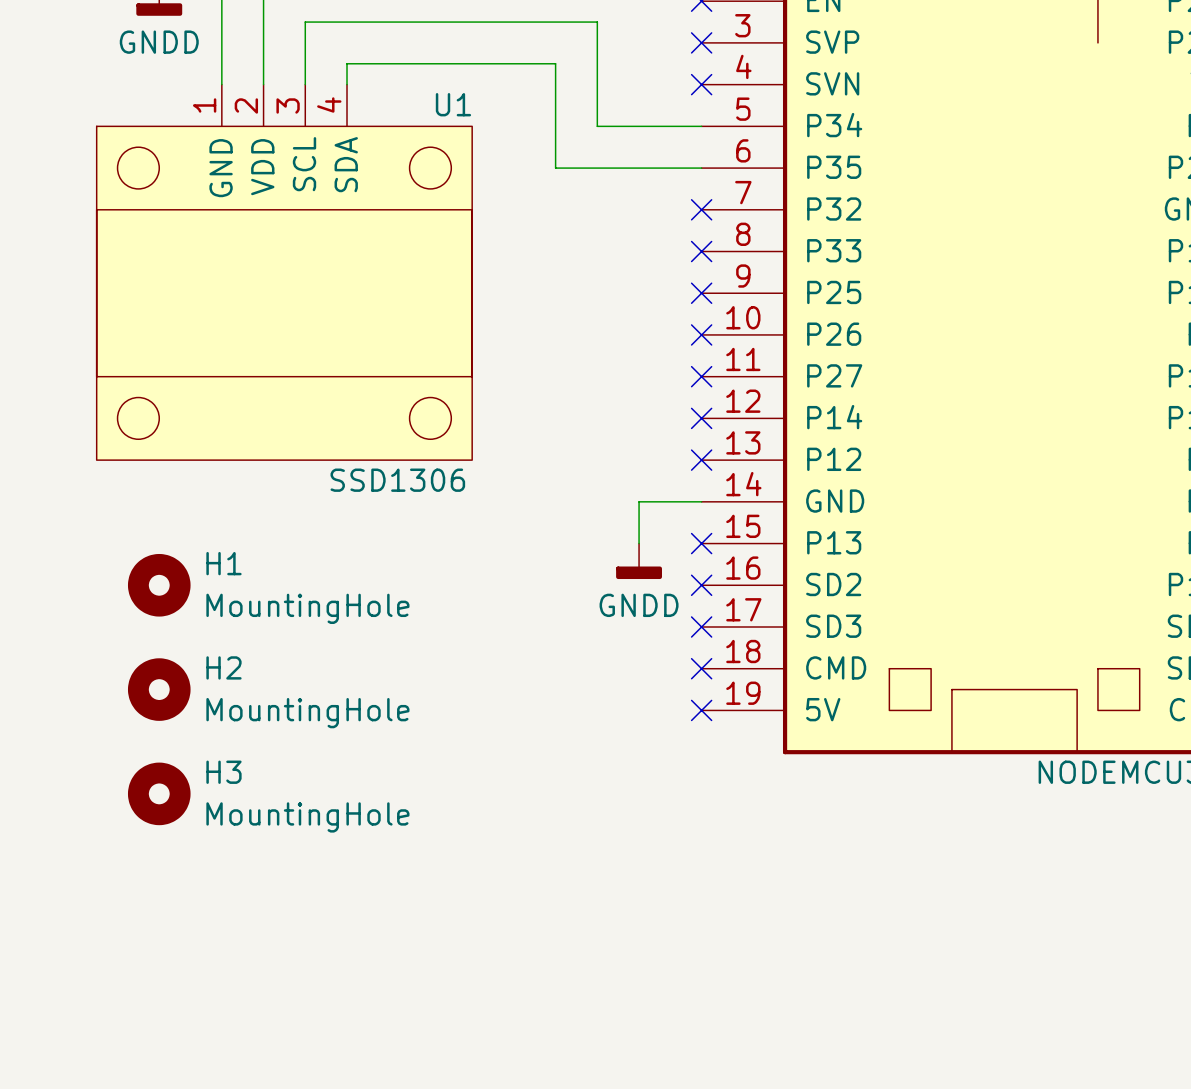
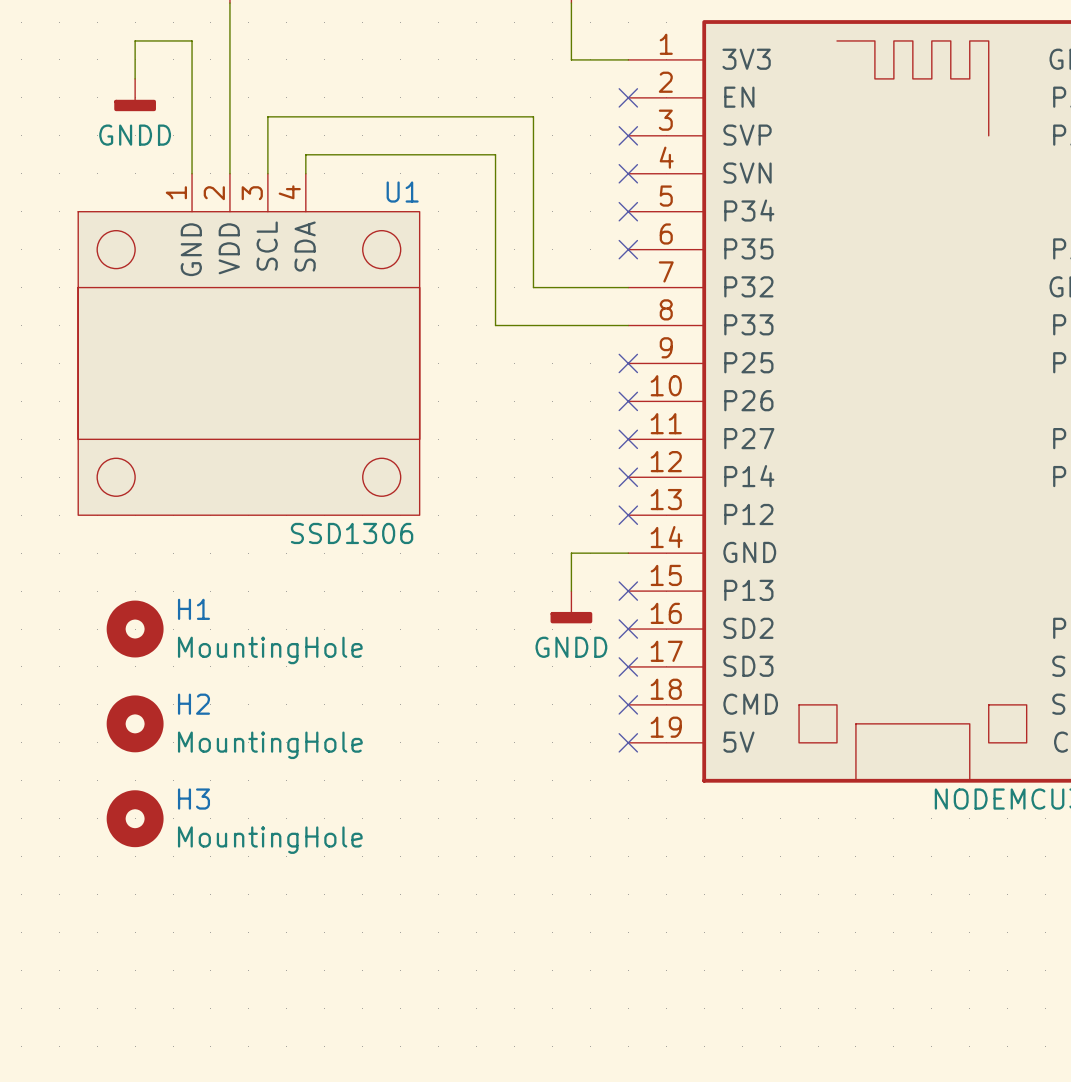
wire: (597, 126) (701, 126) -> (533, 211) (533, 287) (628, 287)
no-connect mark: none -> (628, 211)
wire: (555, 168) (701, 168) -> (495, 249) (495, 325) (628, 325)
no-connect mark: none -> (628, 249)
no-connect mark: (701, 209) -> none
no-connect mark: (701, 251) -> none

